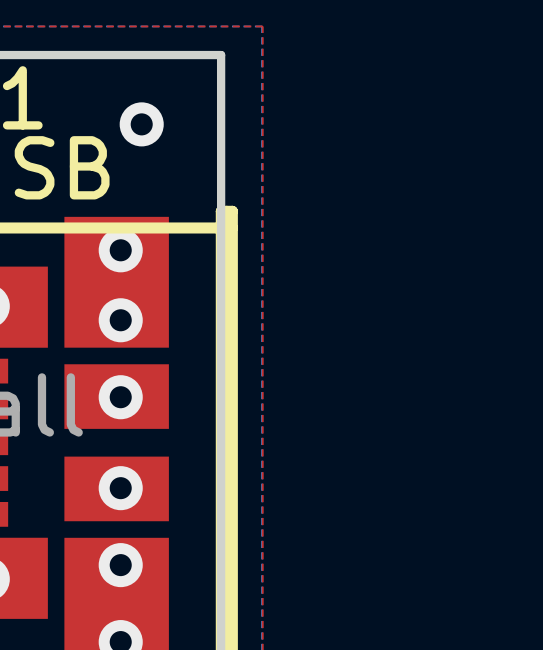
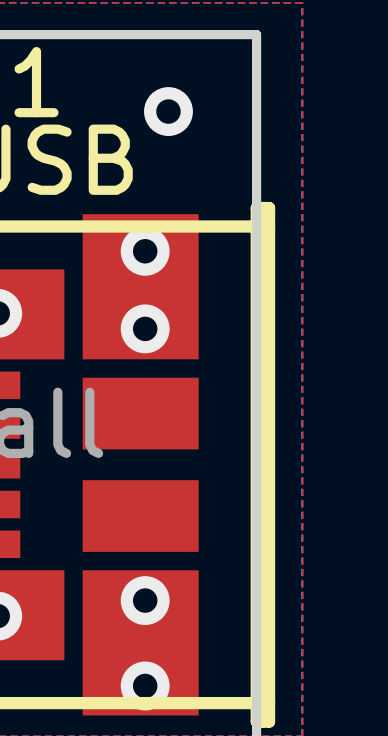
via: (120, 397) -> none
via: (120, 488) -> none

